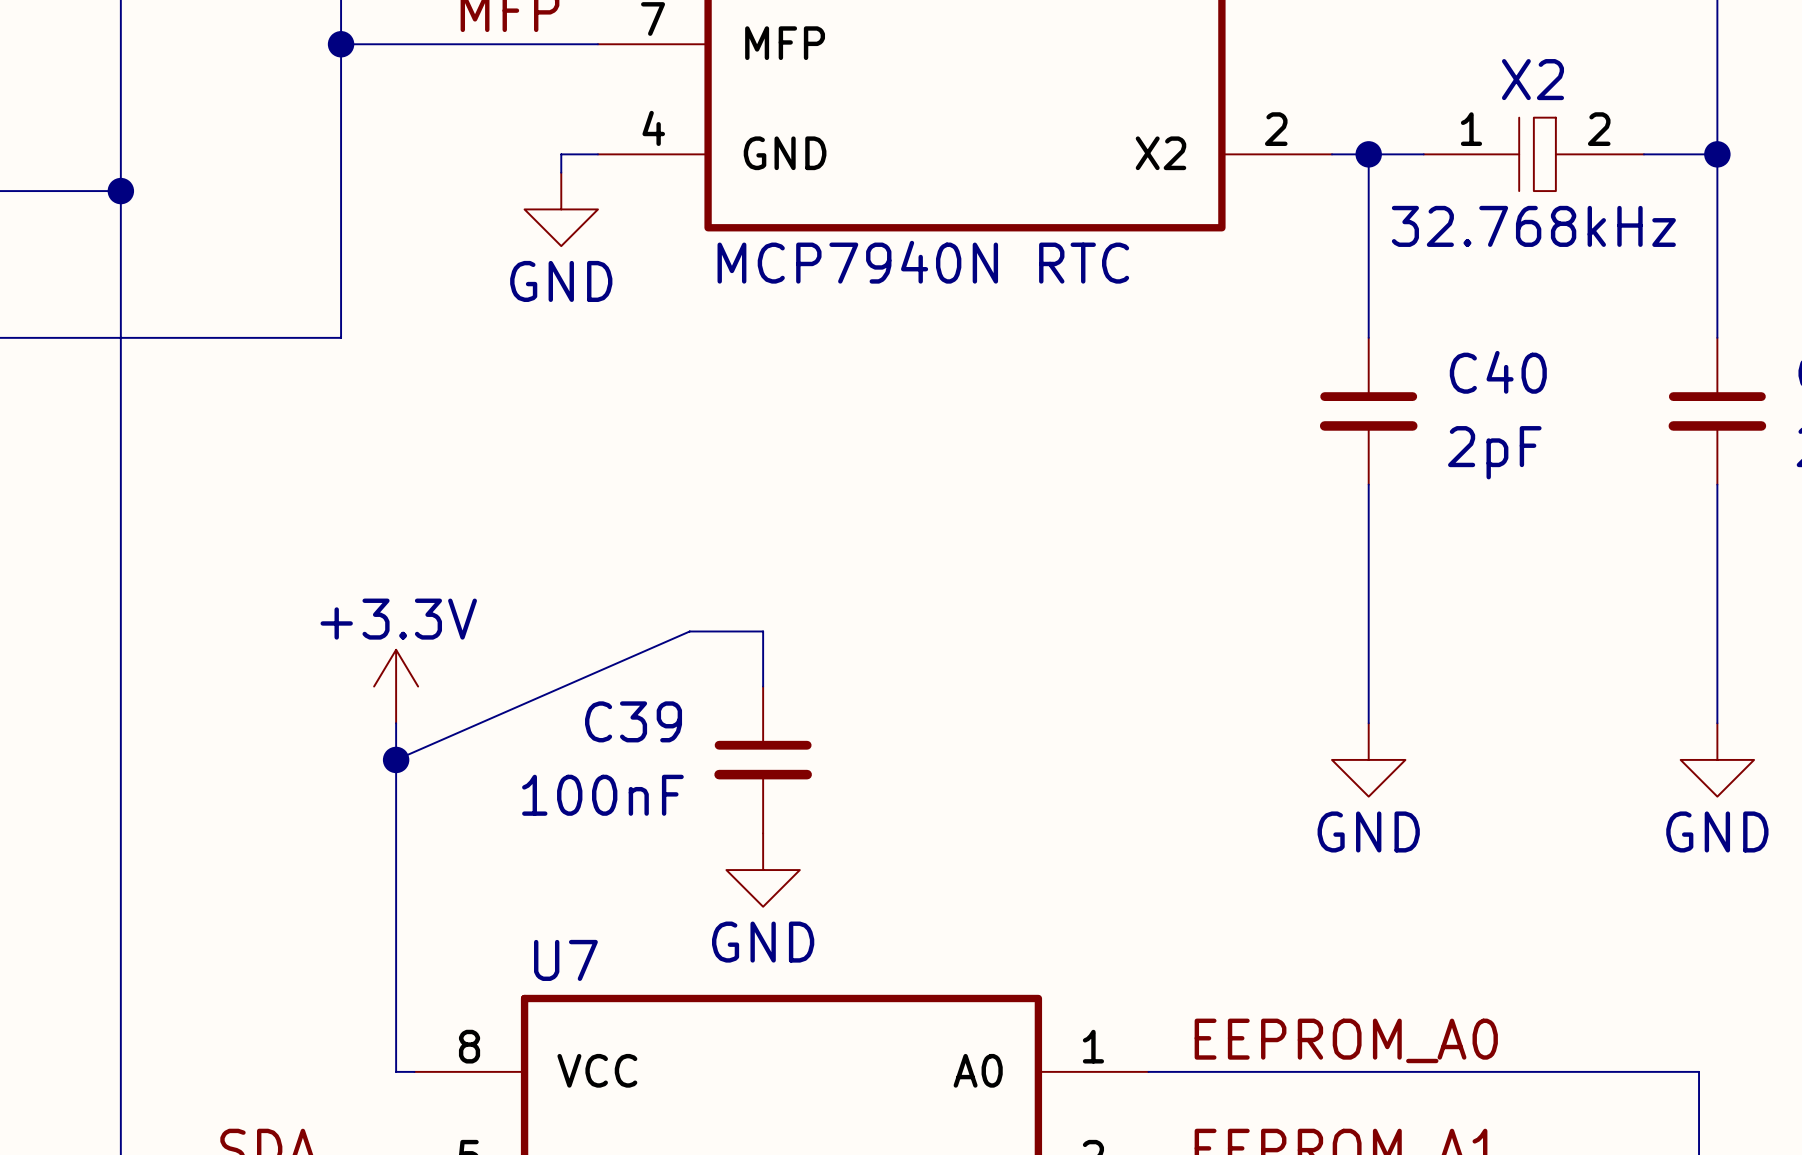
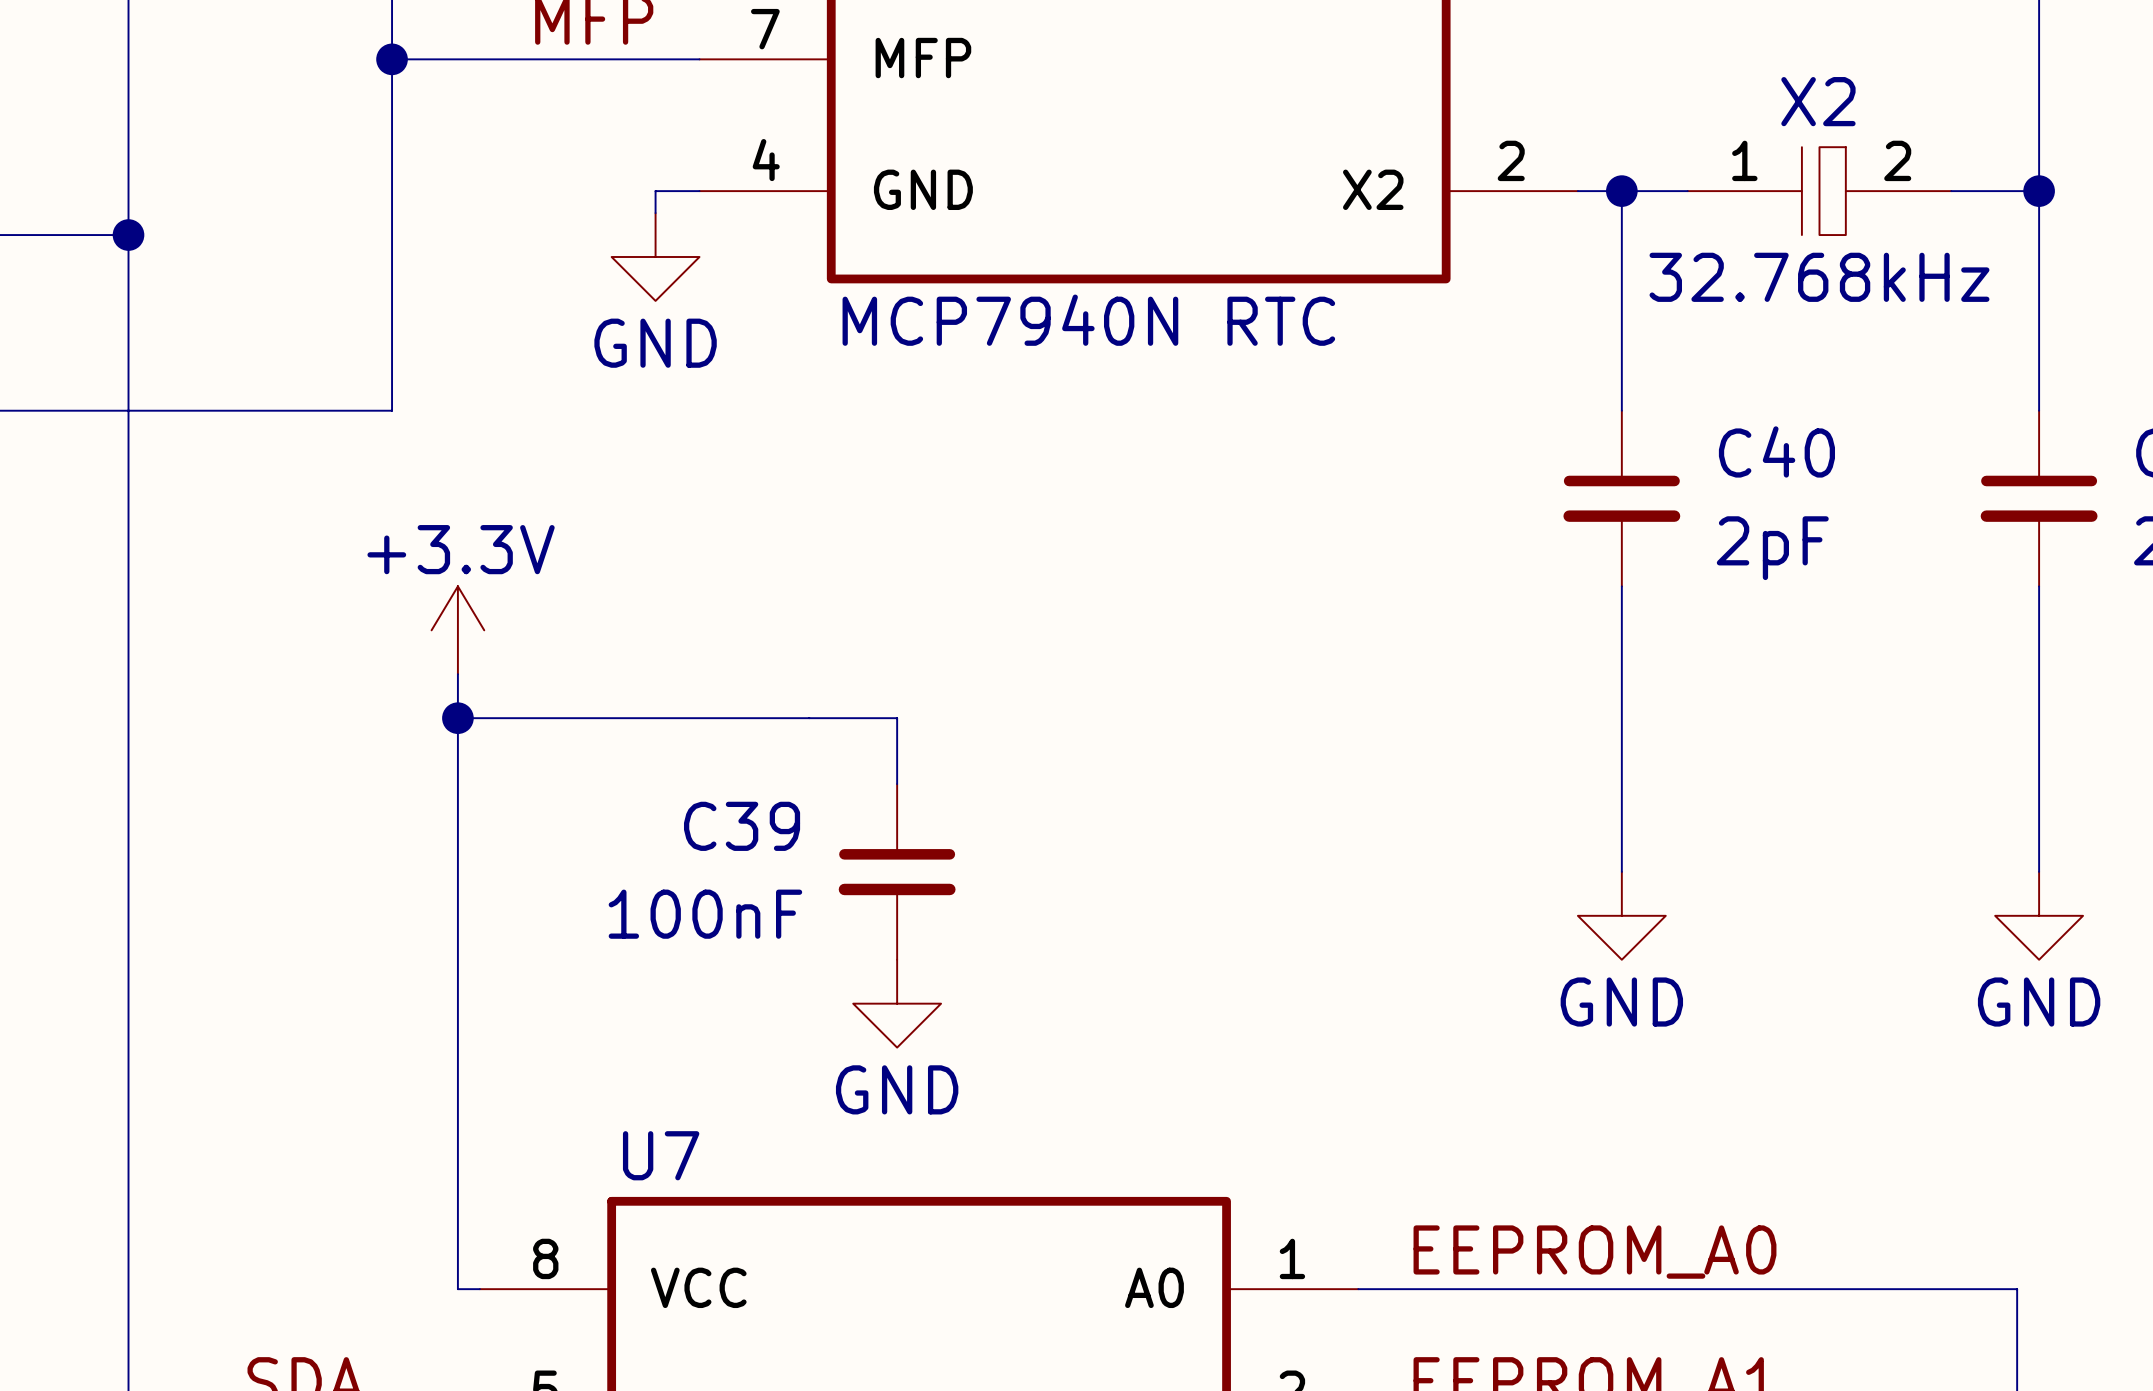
wire: none -> (457, 674) (457, 871)
wire: (763, 631) (689, 631) (396, 759) -> (897, 762) (897, 718) (457, 718)
power symbol position: +3.3V (396, 686) -> +3.3V (457, 630)
junction position: (396, 759) -> (457, 718)
C39 position: (763, 759) -> (897, 871)
power symbol position: GND (763, 870) -> GND (897, 1003)

